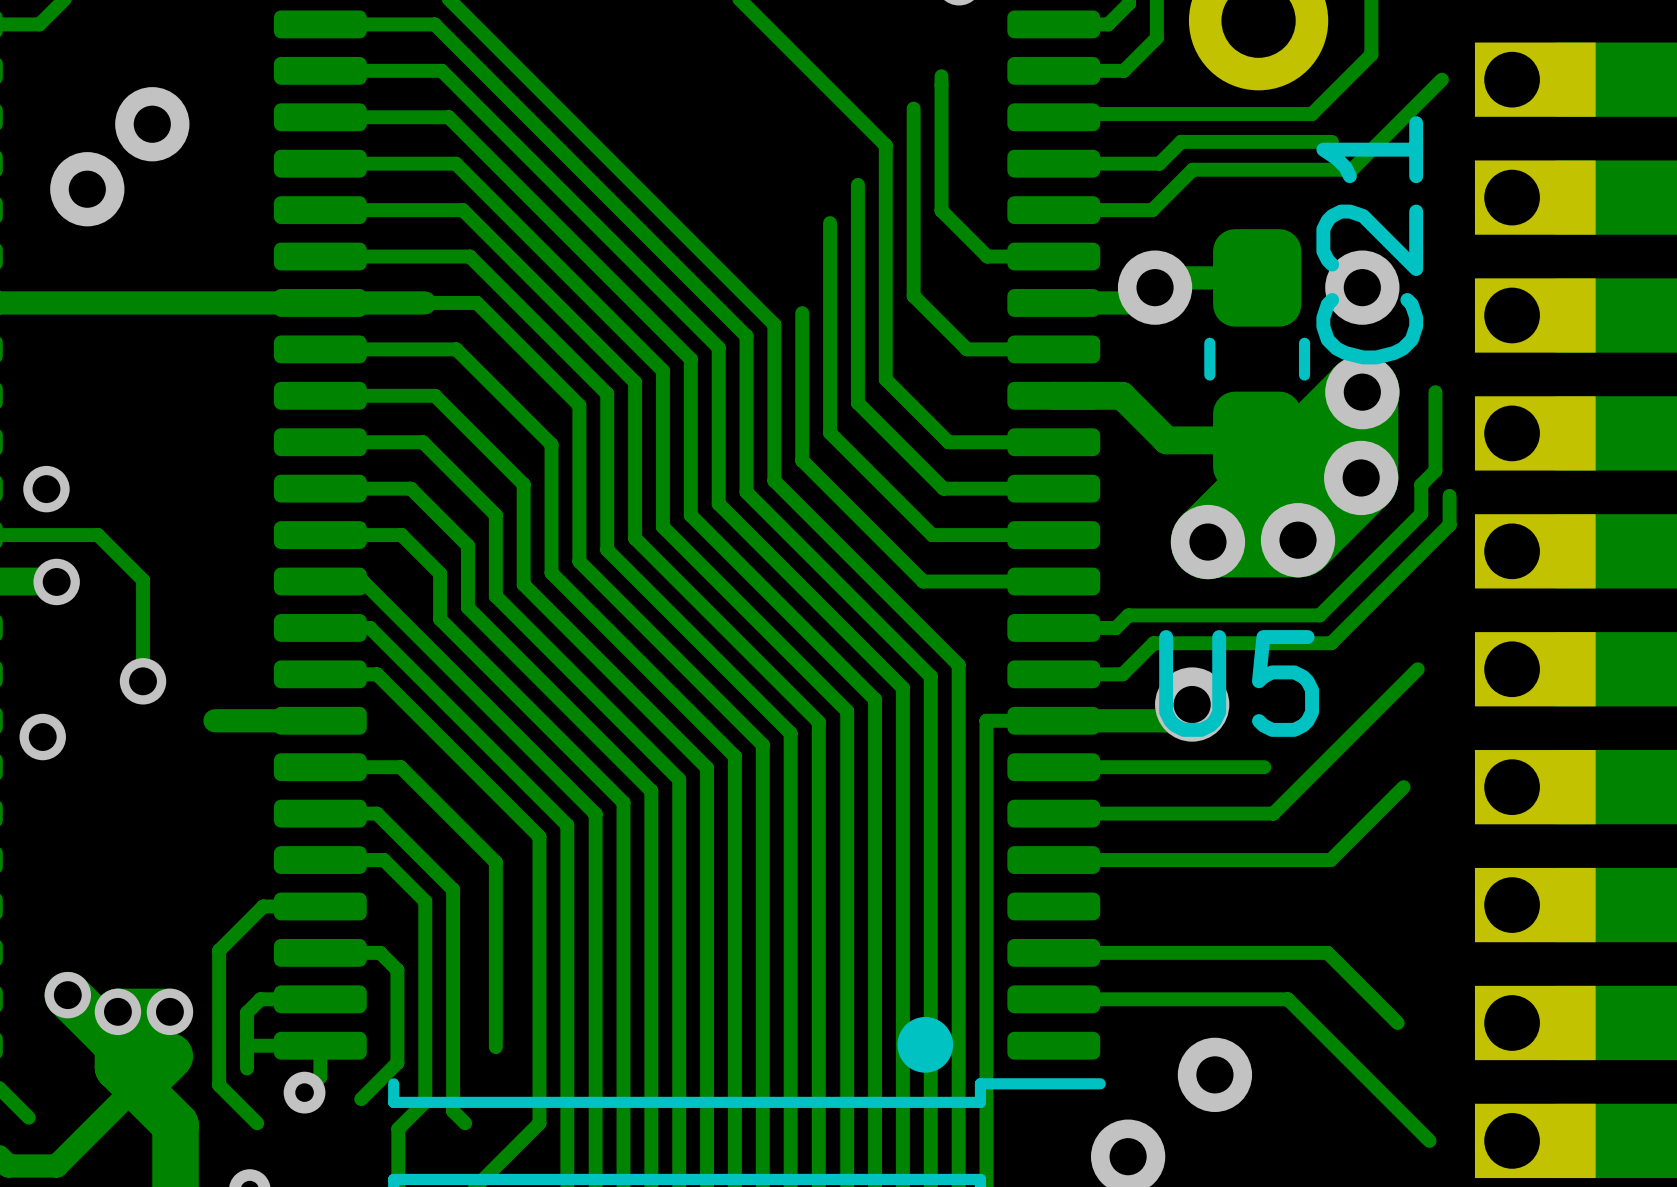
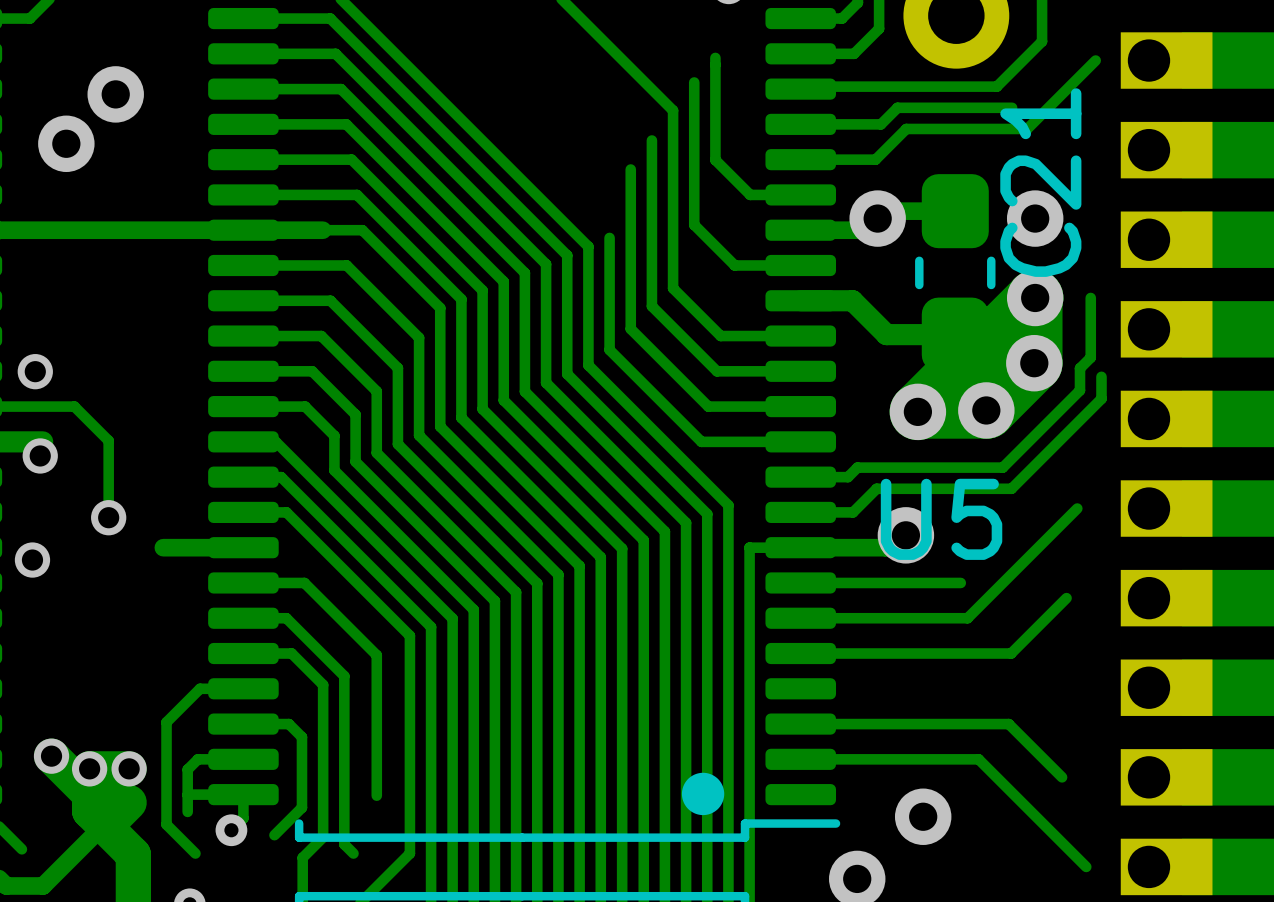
via position: (56, 581) -> (40, 455)

